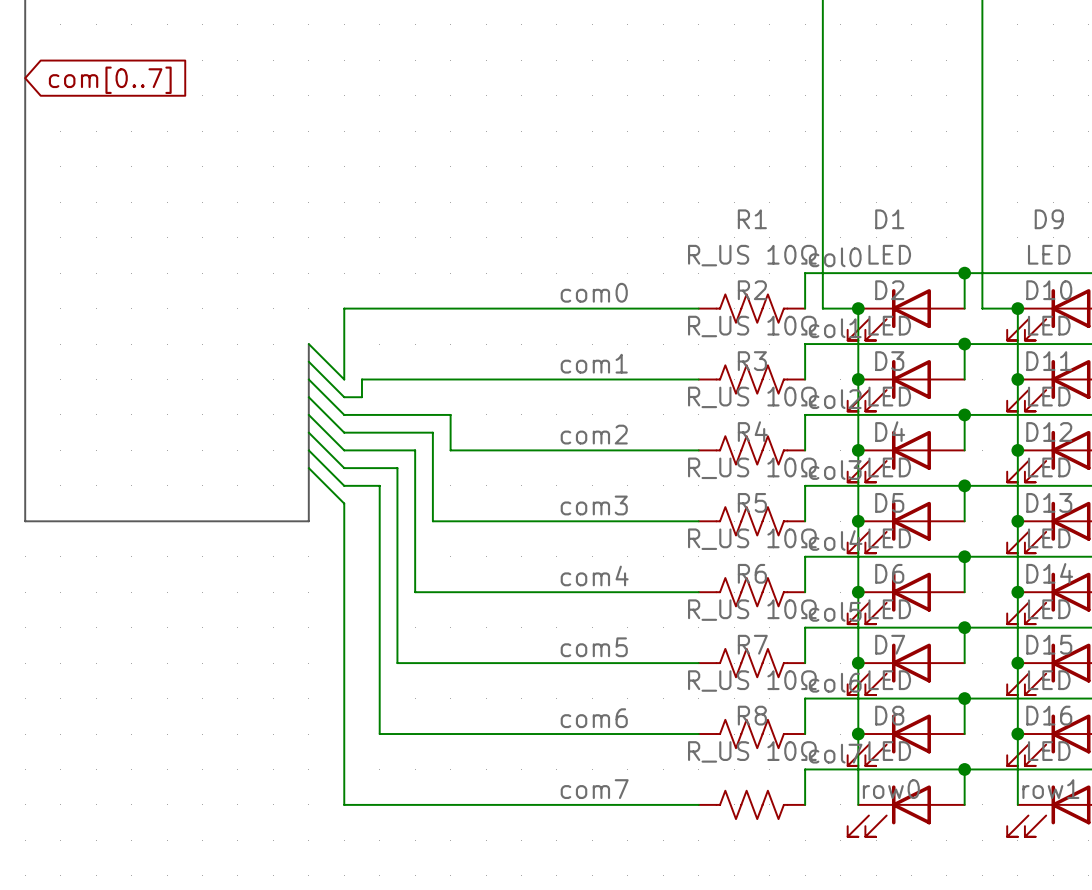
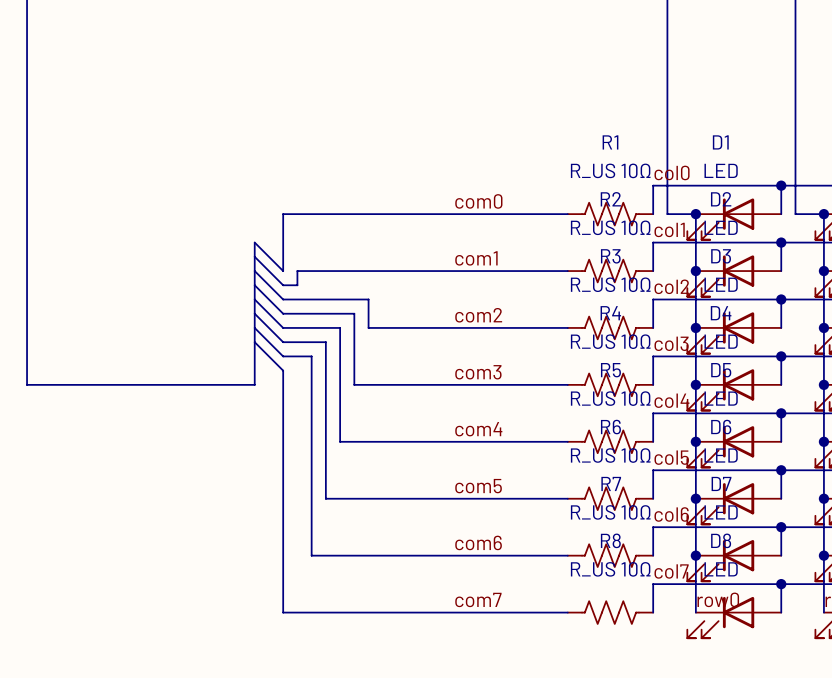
global label: com[0..7] (110, 80) -> none

